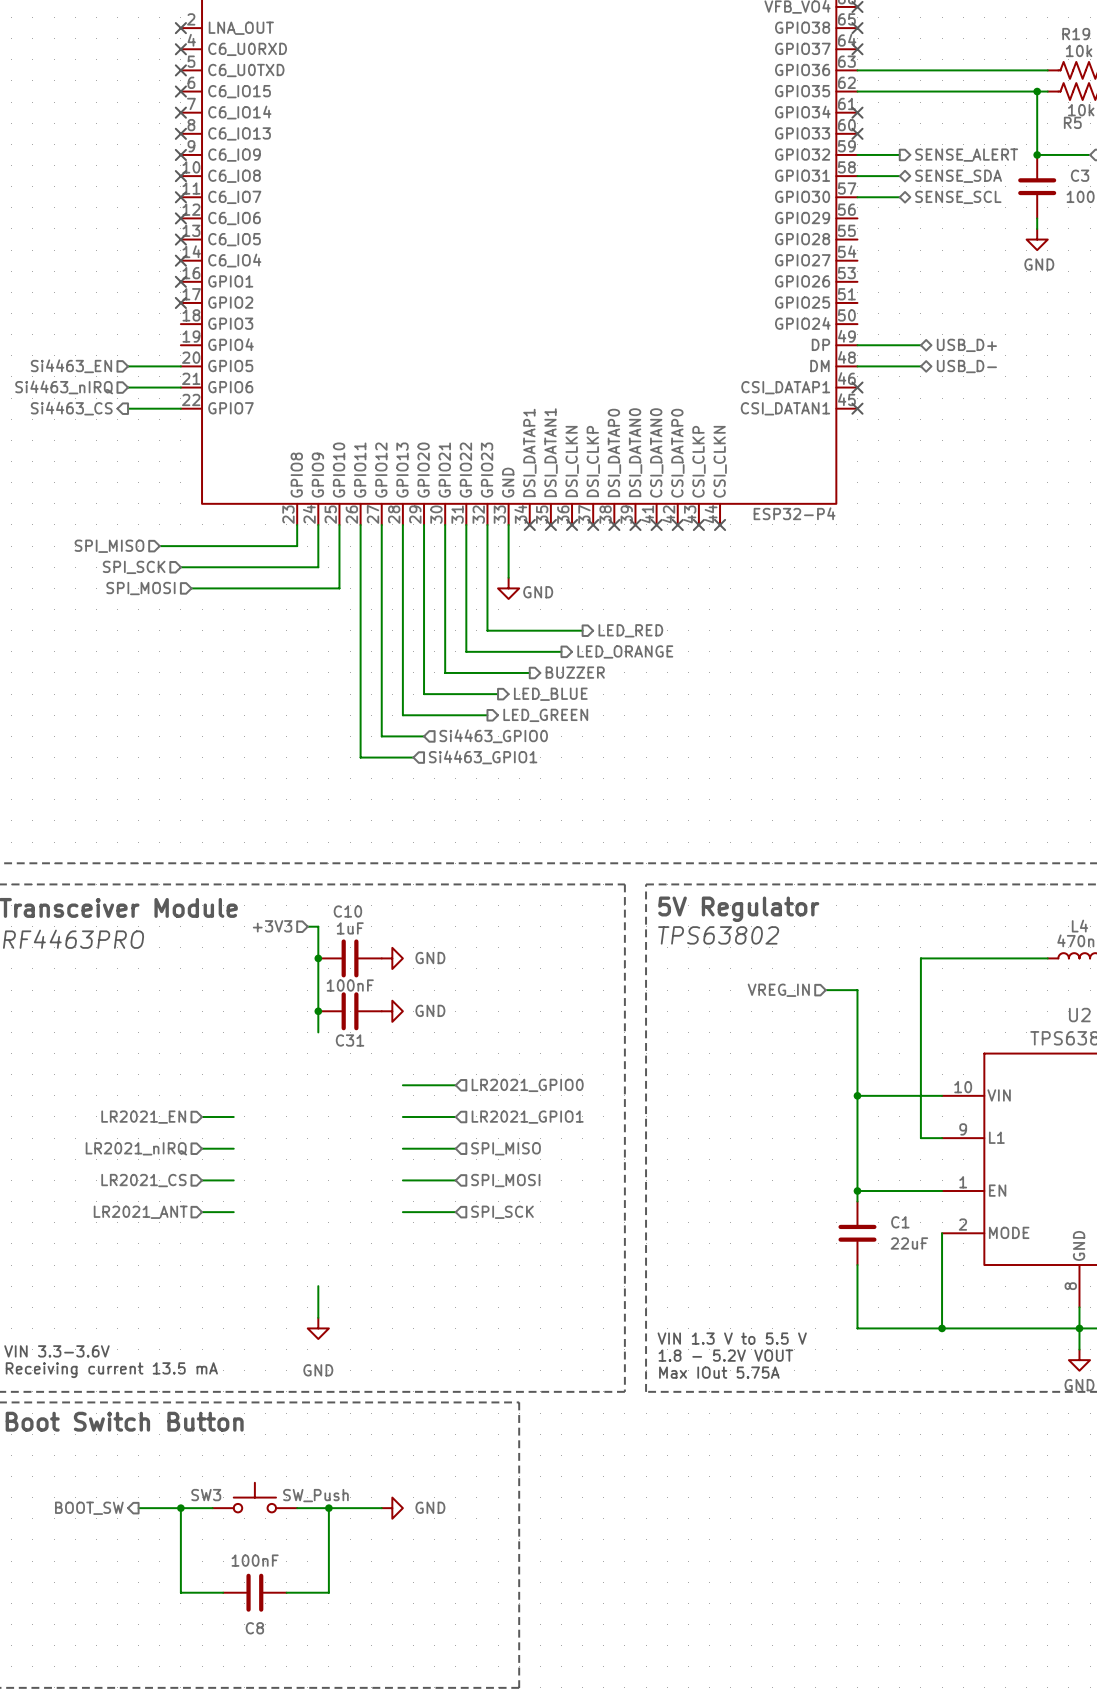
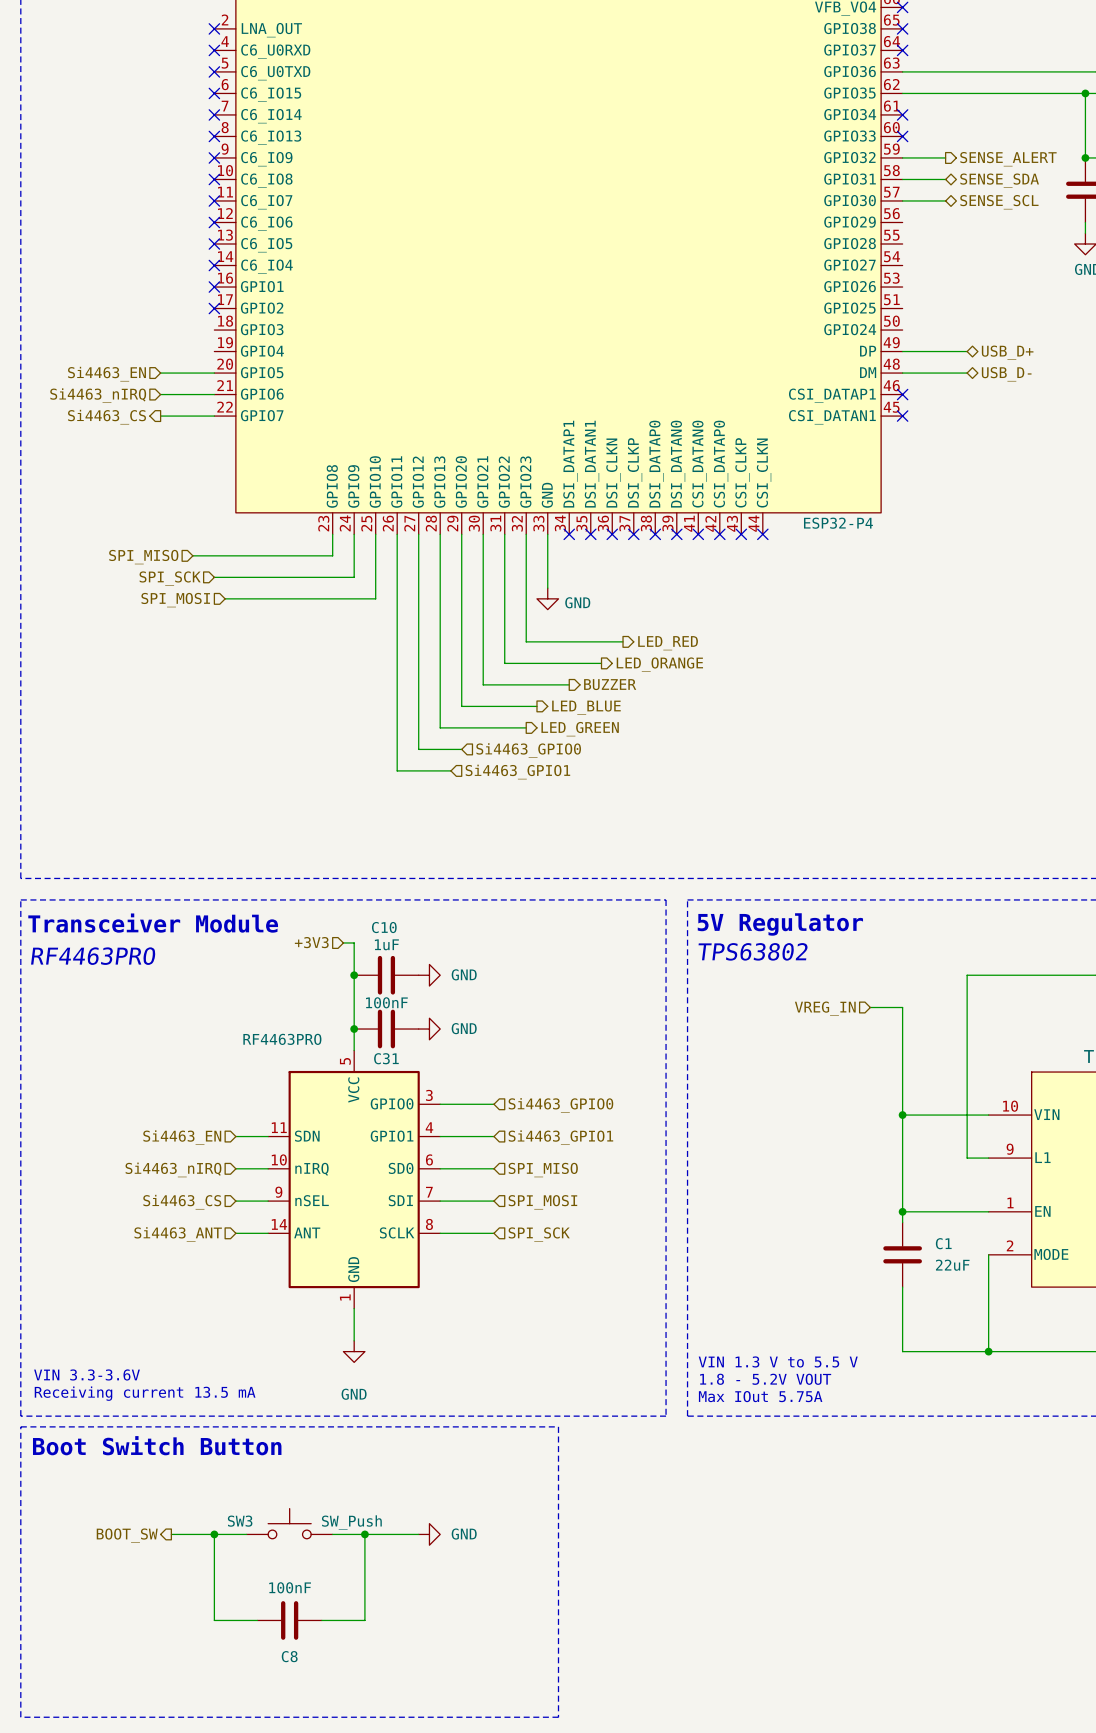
hierarchical label: LR2021_GPIO0 (527, 1085) -> Si4463_GPIO0 (560, 1105)
hierarchical label: LR2021_EN (143, 1117) -> Si4463_EN (182, 1137)
hierarchical label: LR2021_GPIO1 (527, 1117) -> Si4463_GPIO1 (560, 1137)
hierarchical label: LR2021_nIRQ (136, 1148) -> Si4463_nIRQ (173, 1169)
part: none -> RF4463PRO (354, 1179)
hierarchical label: LR2021_CS (143, 1180) -> Si4463_CS (182, 1202)
hierarchical label: LR2021_ANT (140, 1212) -> Si4463_ANT (178, 1234)

